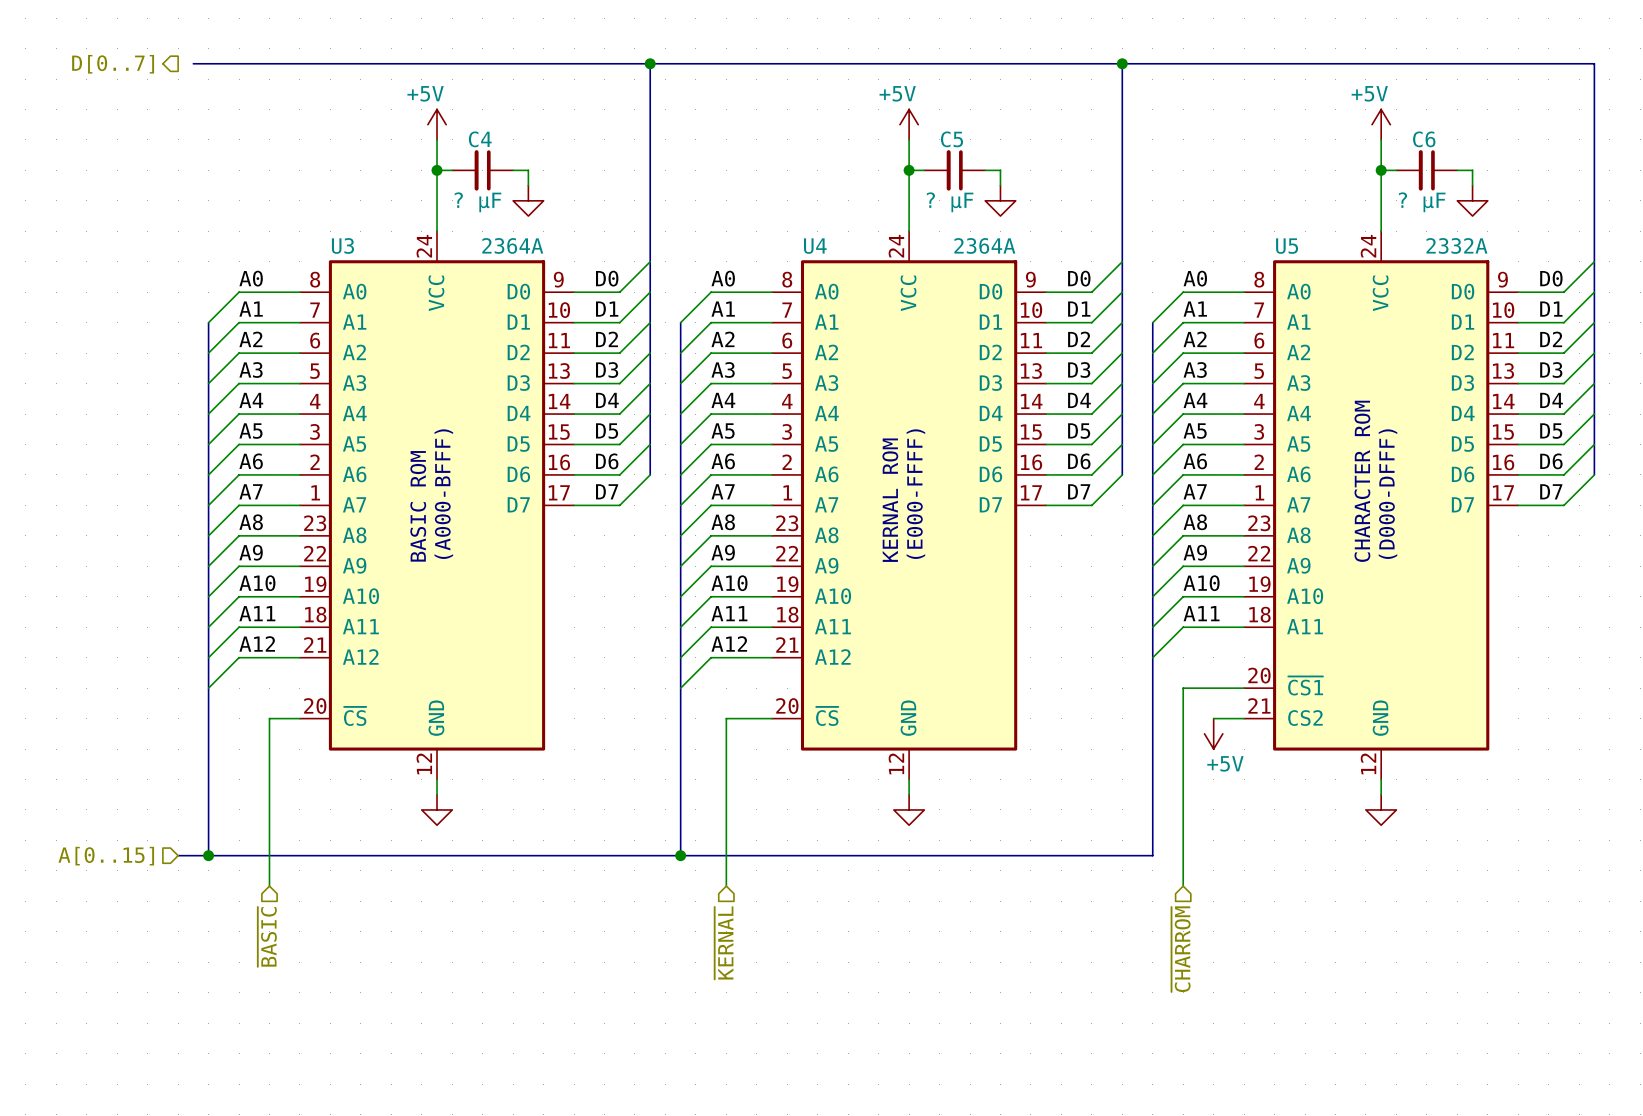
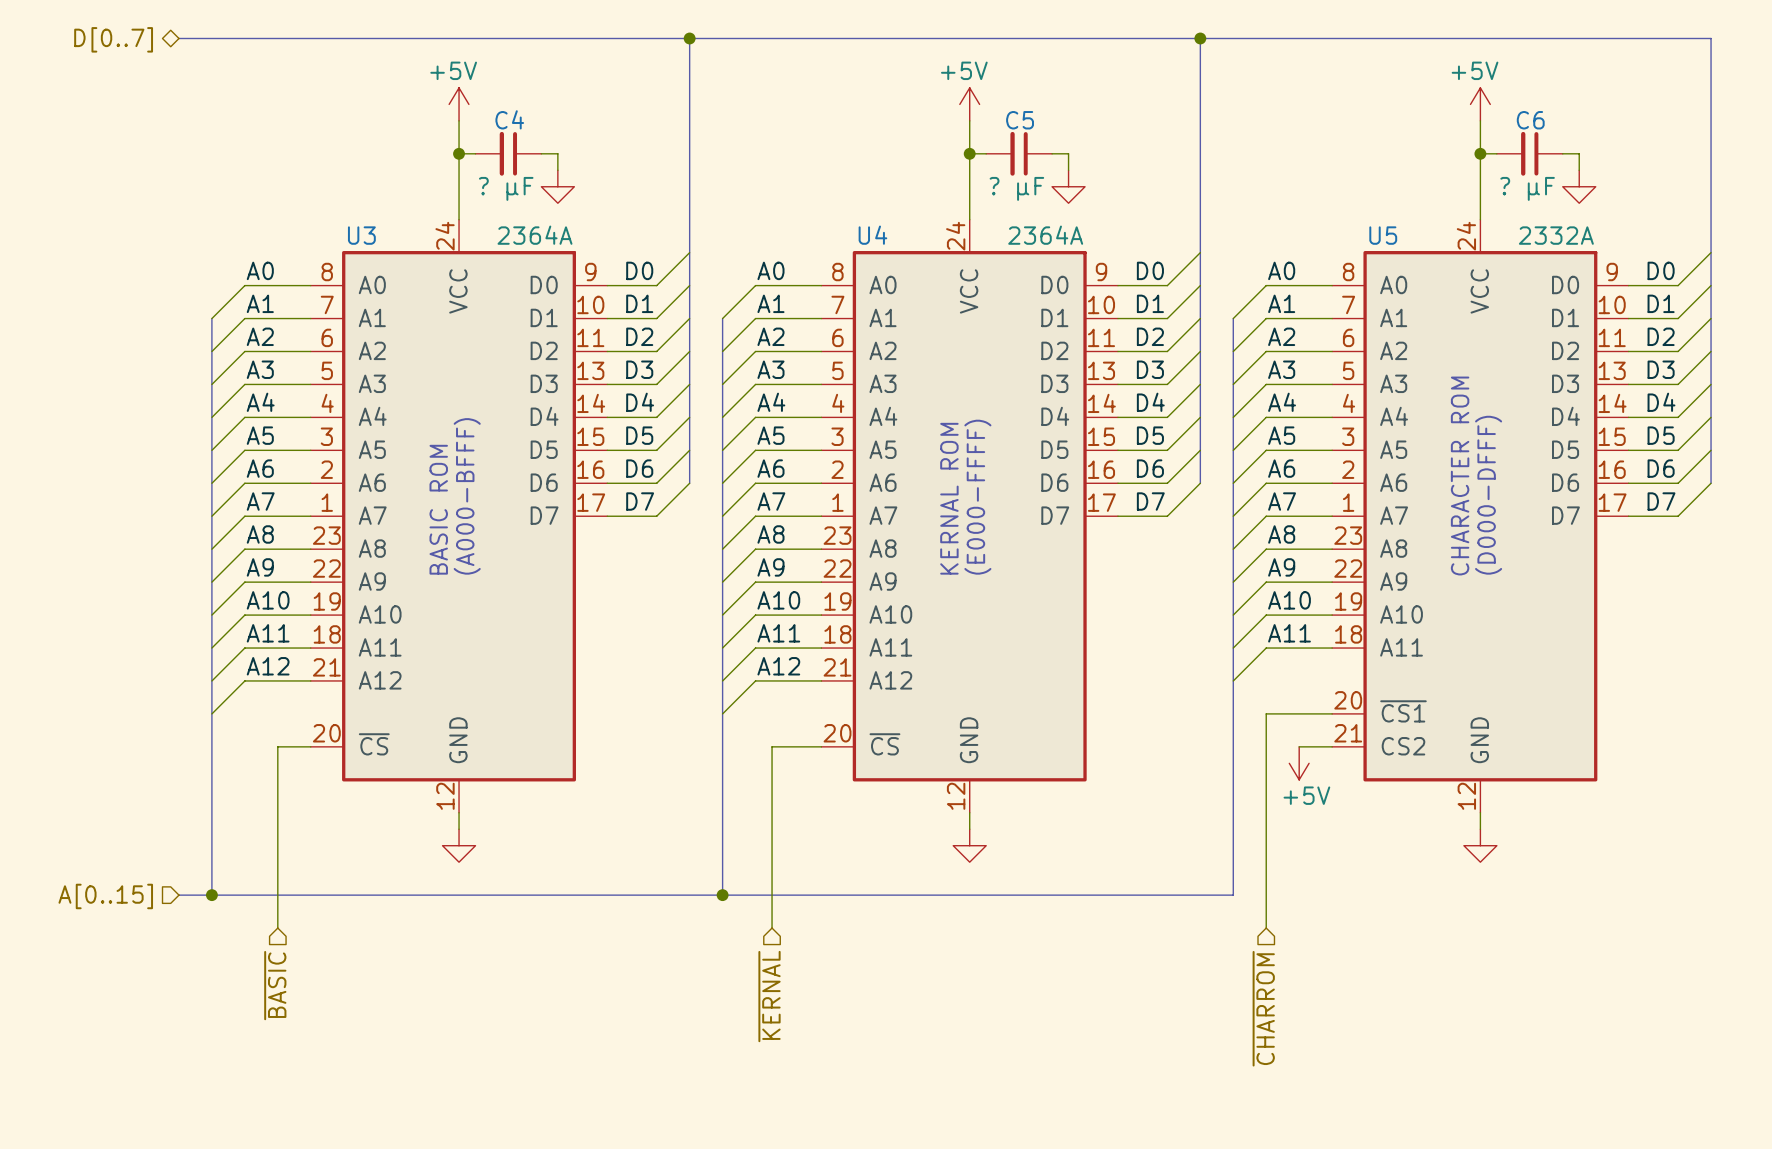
bus: none -> (178, 38) (195, 38)
hierarchical label shape: output (113, 64) -> bidirectional (113, 39)

